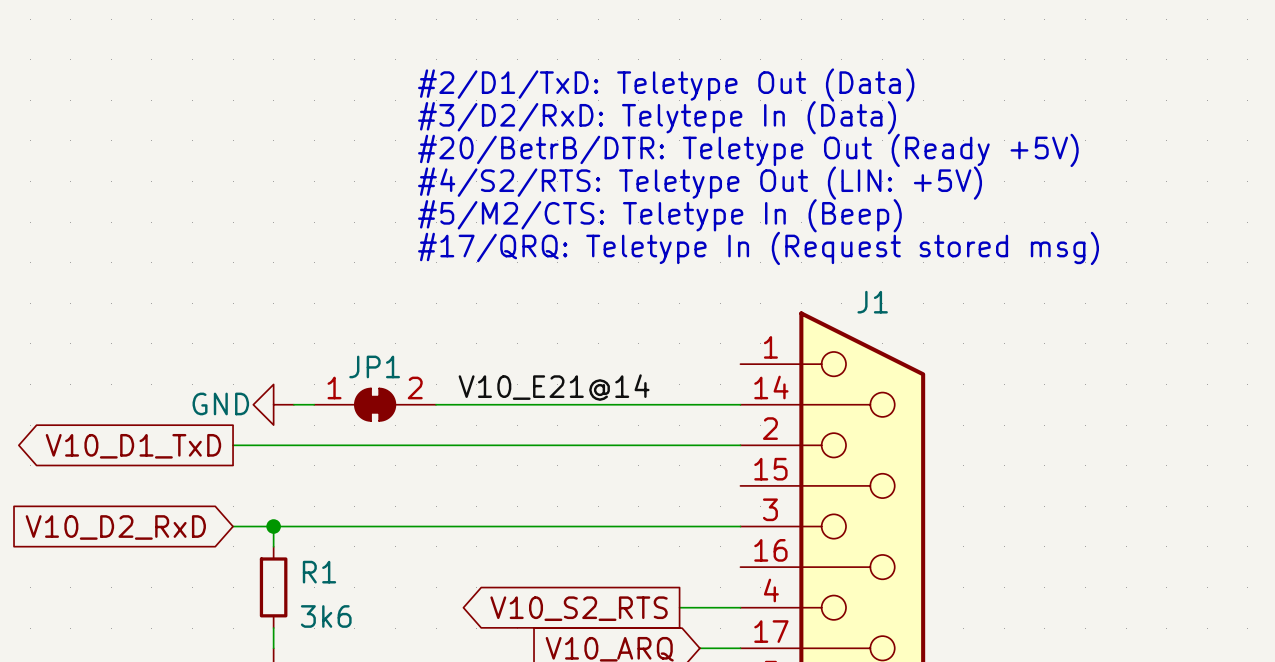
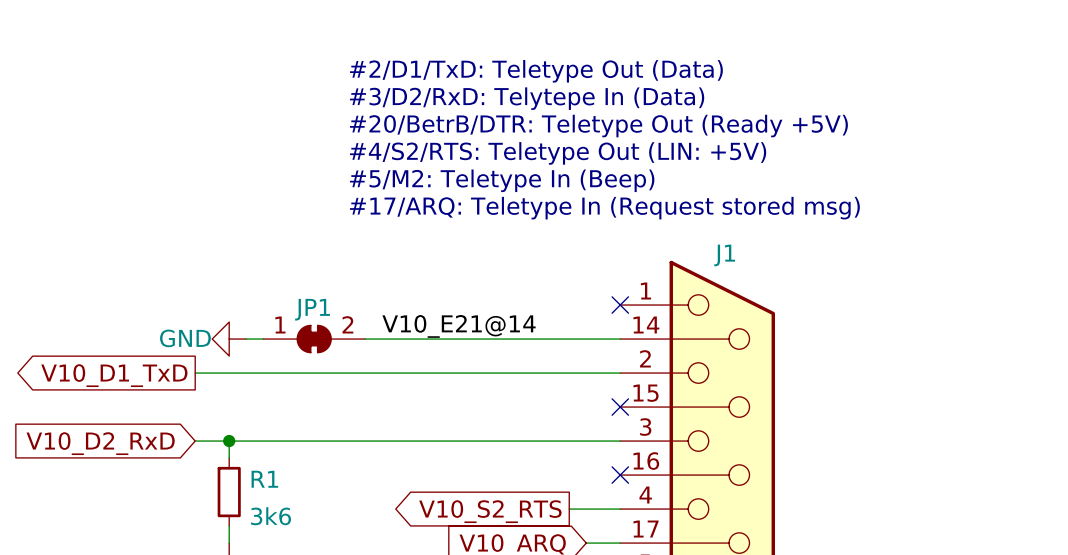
text: #5/M2/CTS: Teletype In (Beep) (659, 215) -> #5/M2: Teletype In (Beep) (502, 180)
text: #17/QRQ: Teletype In (Request stored msg) (758, 248) -> #17/ARQ: Teletype In (Request stored msg) (604, 208)
no-connect mark: none -> (620, 305)
no-connect mark: none -> (620, 407)
no-connect mark: none -> (620, 475)

